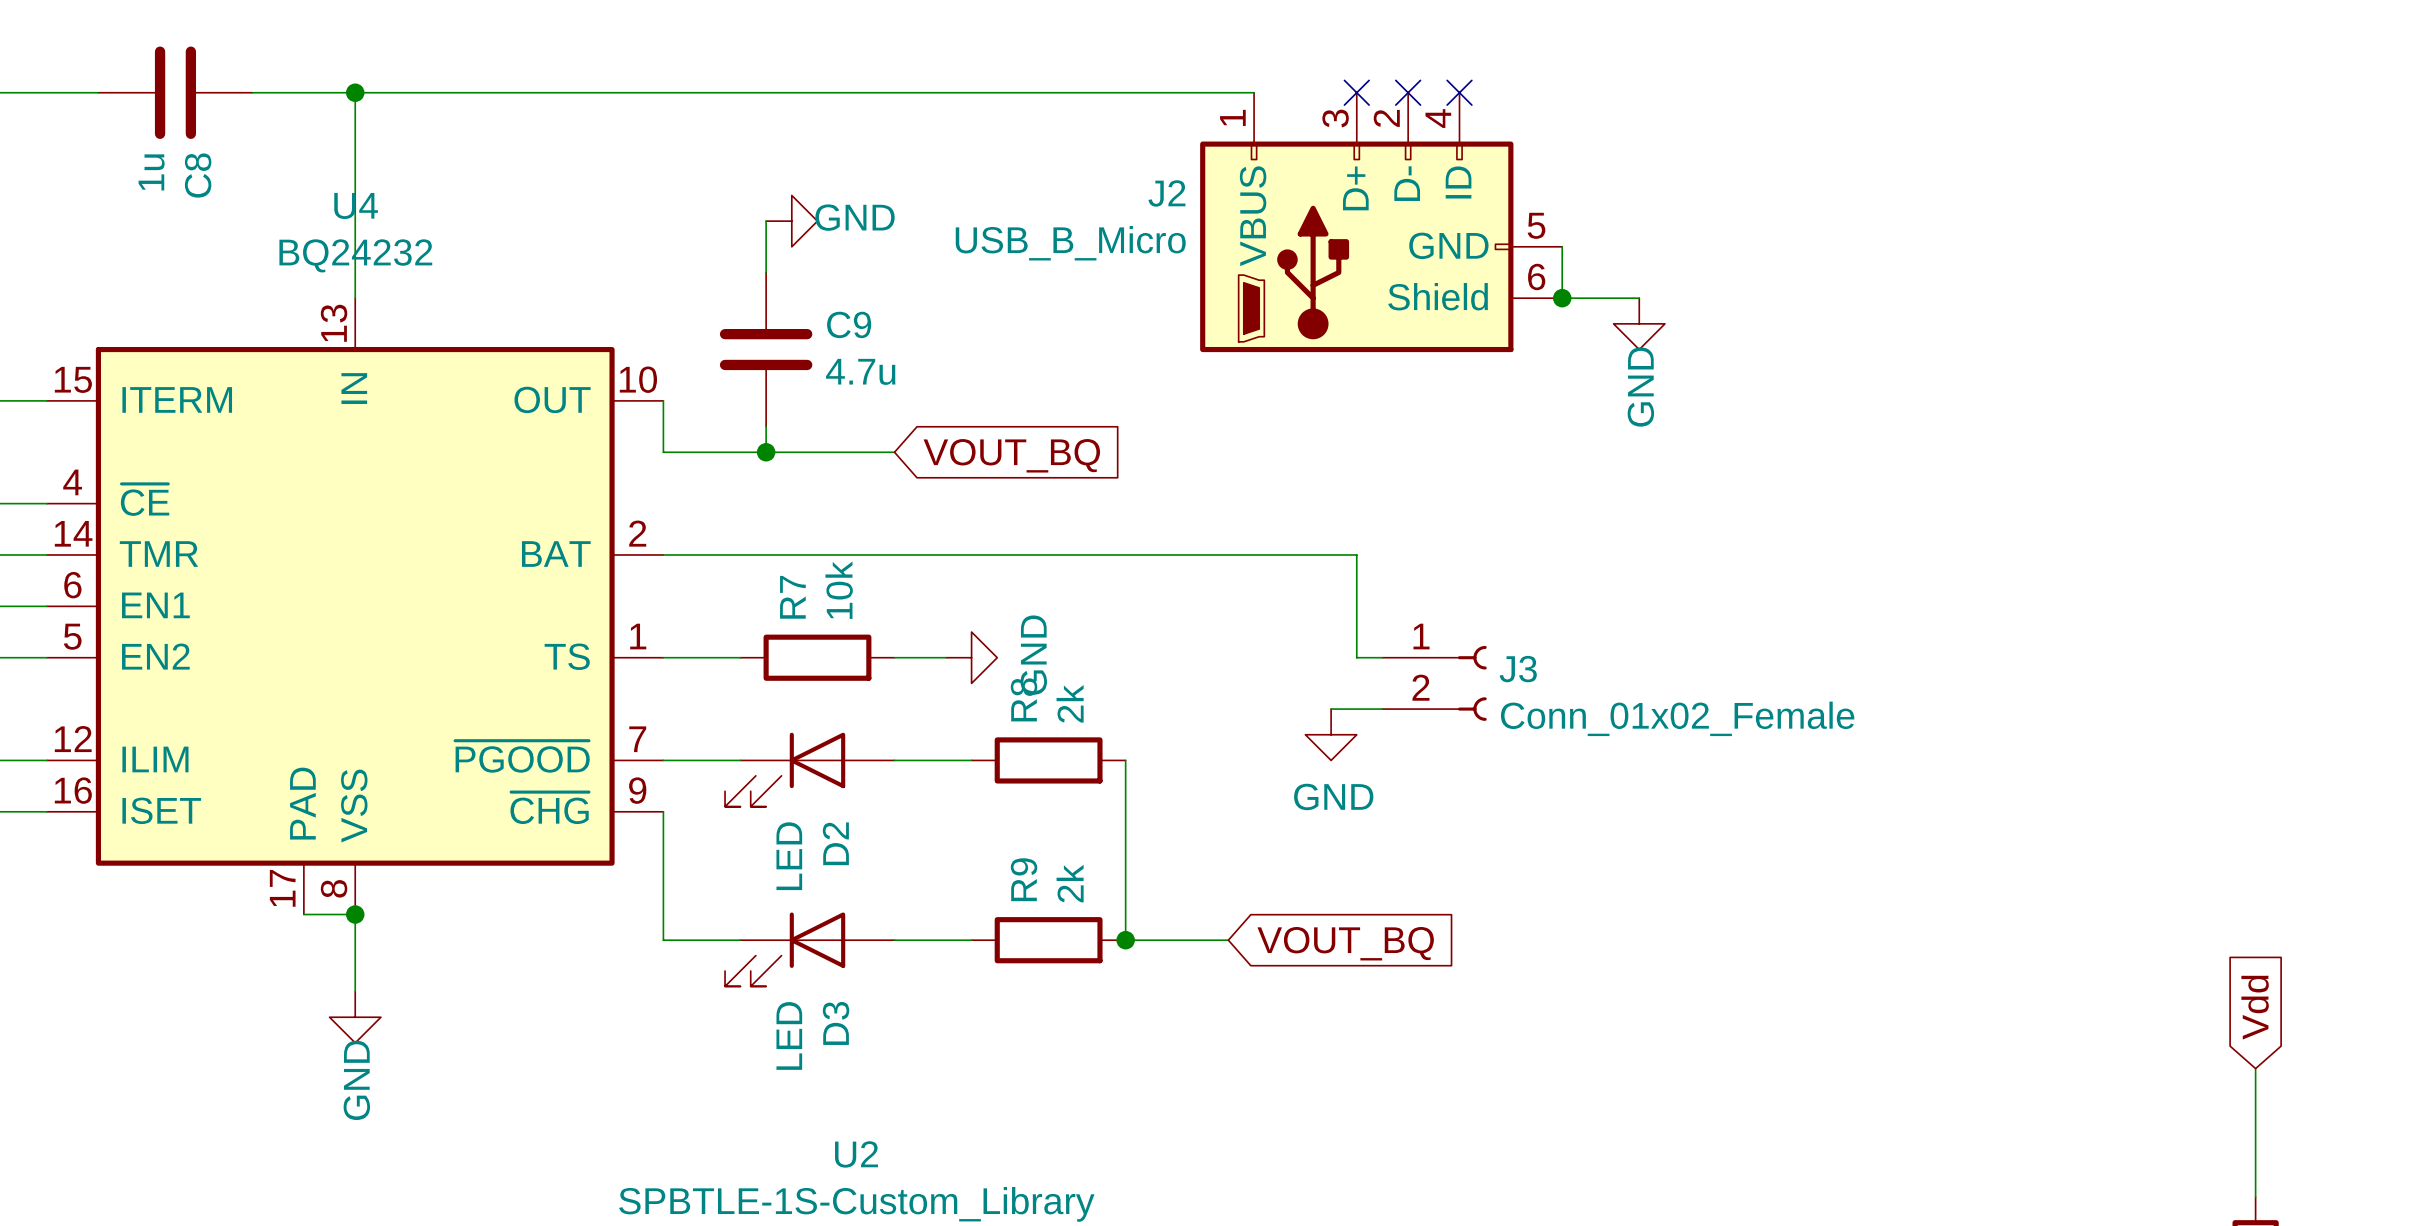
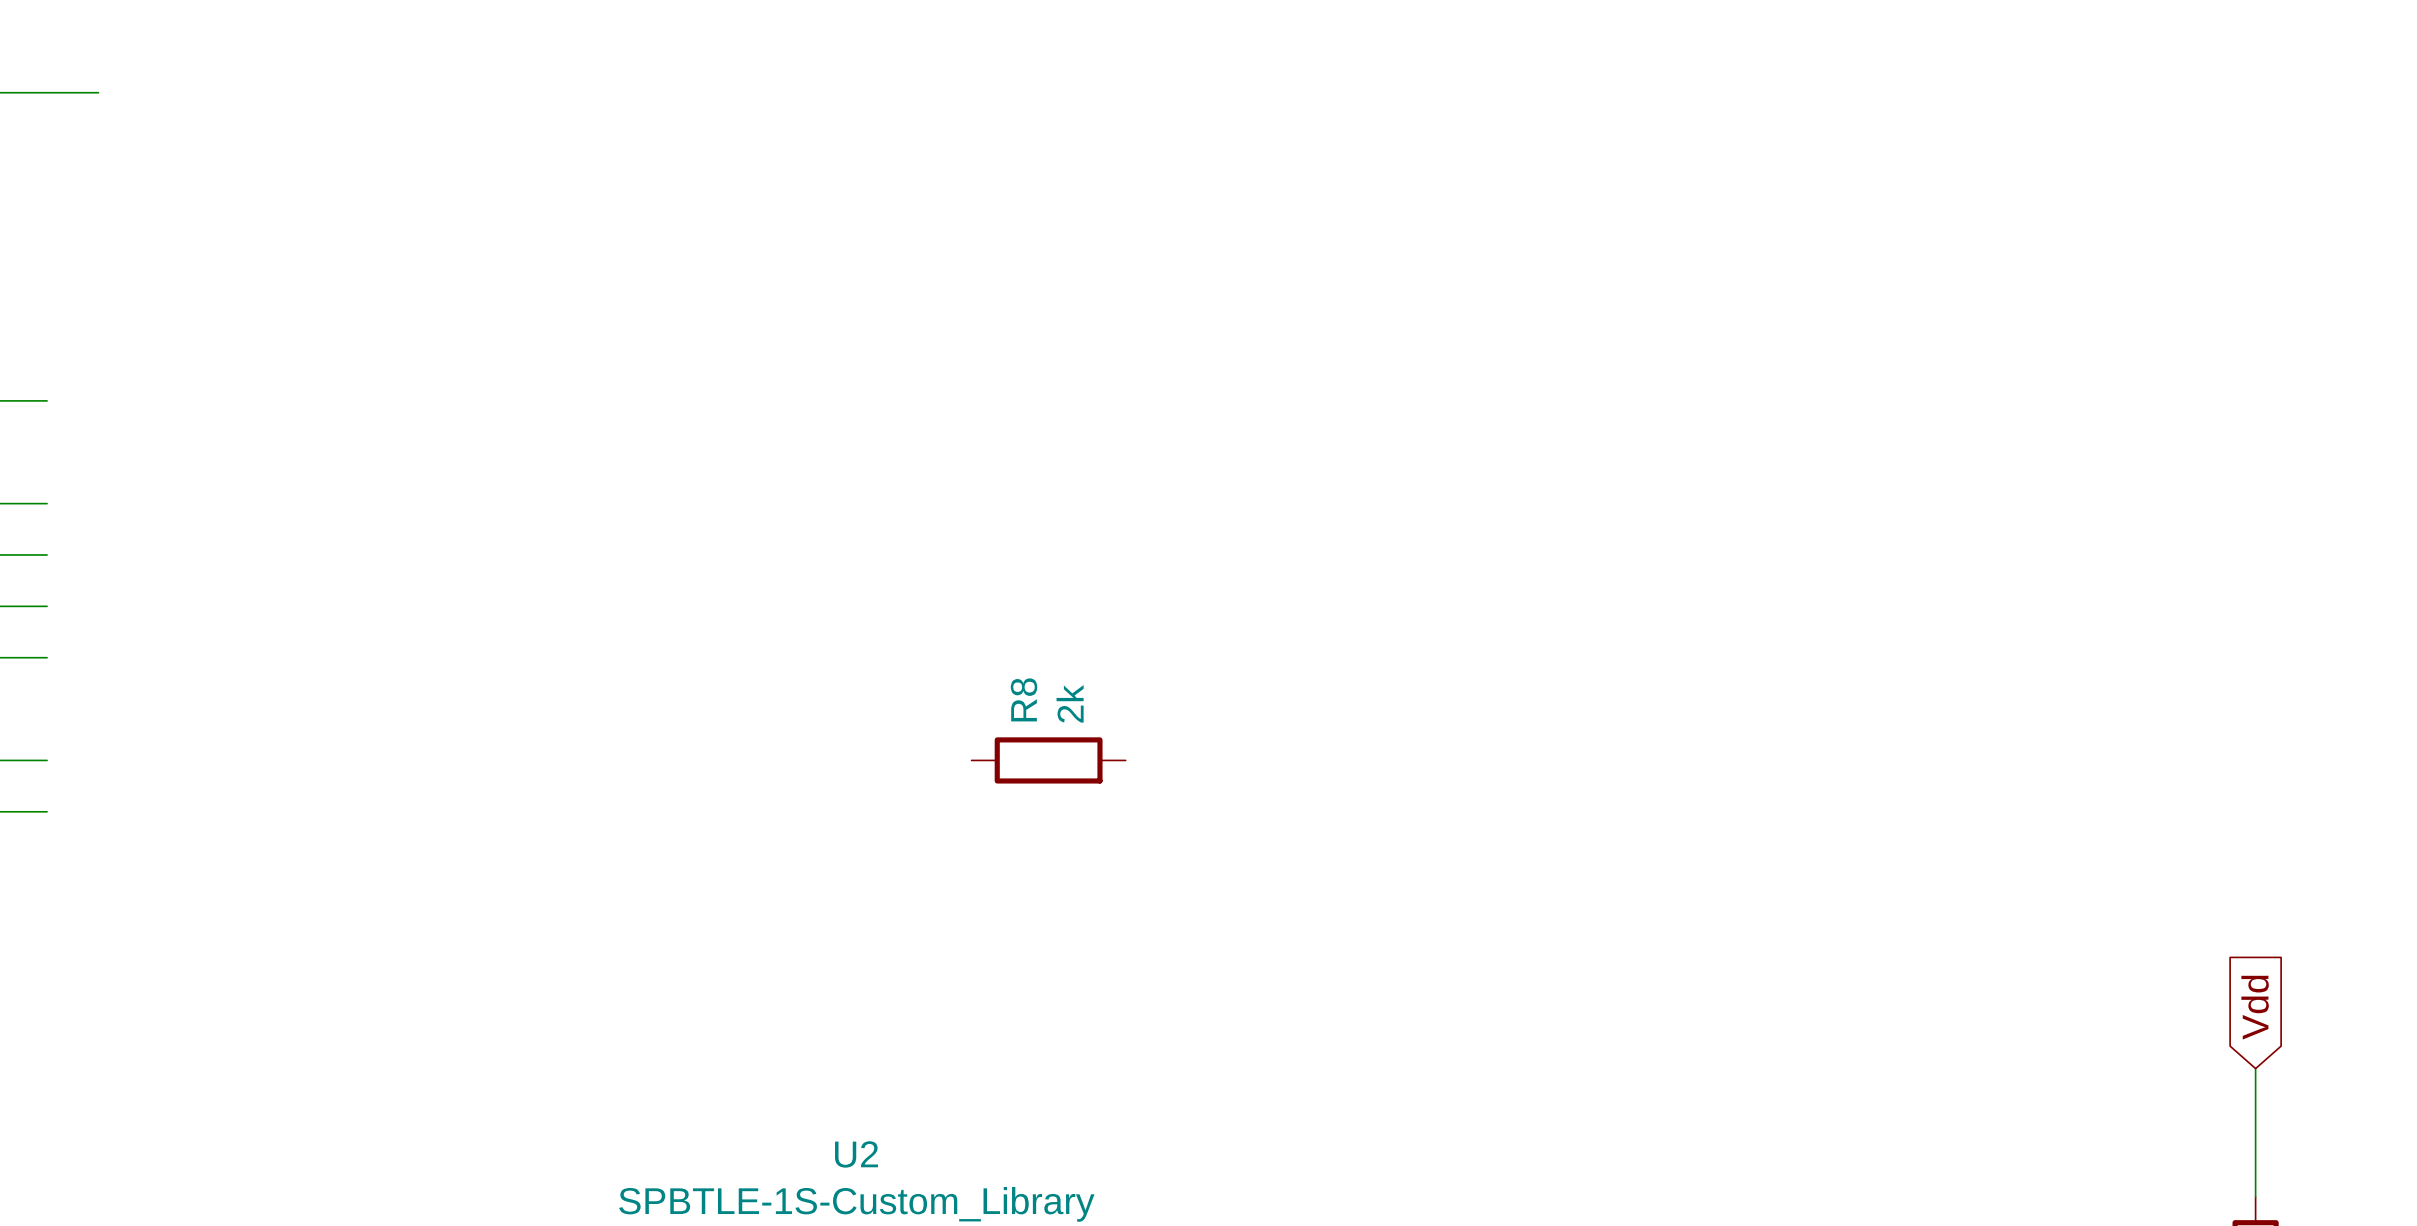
C8: 1u (175, 92) -> none
wire: (252, 92) (1254, 92) -> none
wire: (355, 92) (355, 298) -> none
junction: (355, 92) -> none
no-connect mark: (1356, 92) -> none
no-connect mark: (1408, 92) -> none
no-connect mark: (1459, 92) -> none
wire: (766, 221) (766, 272) -> none
power symbol: GND (791, 221) -> none
J2: USB_B_Micro (1381, 222) -> none
wire: (1562, 246) (1562, 298) (1639, 298) -> none
junction: (1562, 298) -> none
power symbol: GND (1639, 323) -> none
C9: 4.7u (766, 349) -> none
wire: (663, 400) (663, 452) (894, 452) -> none
wire: (766, 426) (766, 452) -> none
junction: (766, 452) -> none
global label: VOUT_BQ (1011, 455) -> none
wire: (663, 554) (1356, 554) (1356, 657) (1382, 657) -> none
U4: BQ24232 (355, 606) -> none
wire: (663, 657) (740, 657) -> none
R7: 10k (817, 657) -> none
wire: (894, 657) (945, 657) -> none
power symbol: GND (971, 657) -> none
J3: Conn_01x02_Female (1434, 683) -> none
wire: (1331, 709) (1382, 709) -> none
power symbol: GND (1331, 734) -> none
wire: (663, 760) (740, 760) -> none
wire: (894, 760) (971, 760) -> none
wire: (1125, 760) (1125, 940) (1228, 940) -> none
D2: LED (809, 769) -> none
wire: (663, 811) (663, 940) (740, 940) -> none
wire: (303, 914) (355, 914) (355, 991) -> none
junction: (355, 914) -> none
wire: (894, 940) (971, 940) -> none
R9: 2k (1048, 940) -> none
junction: (1125, 940) -> none
global label: VOUT_BQ (1345, 943) -> none
D3: LED (809, 949) -> none
power symbol: GND (355, 1017) -> none

